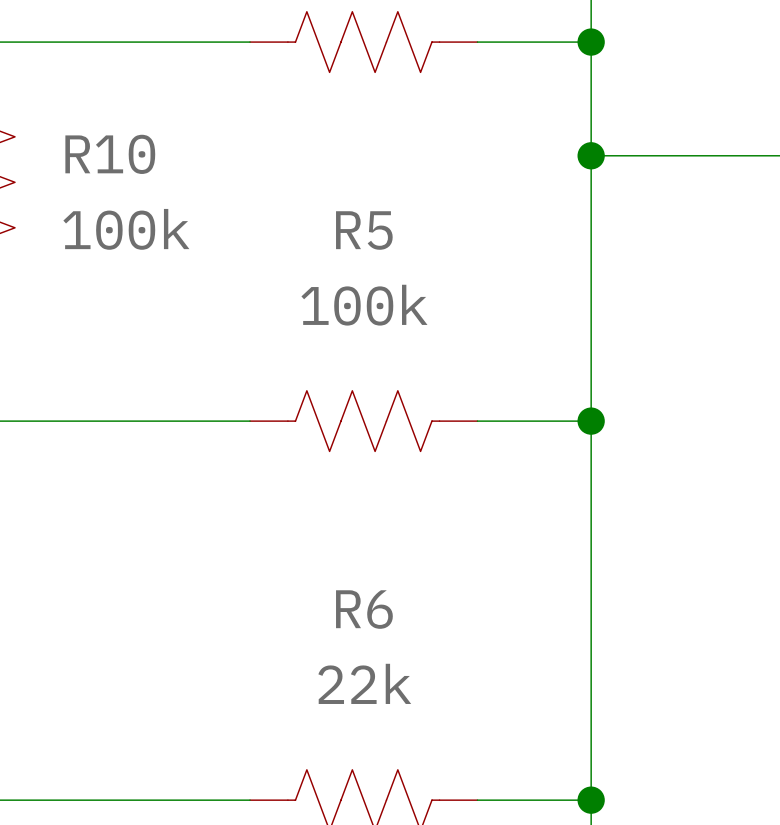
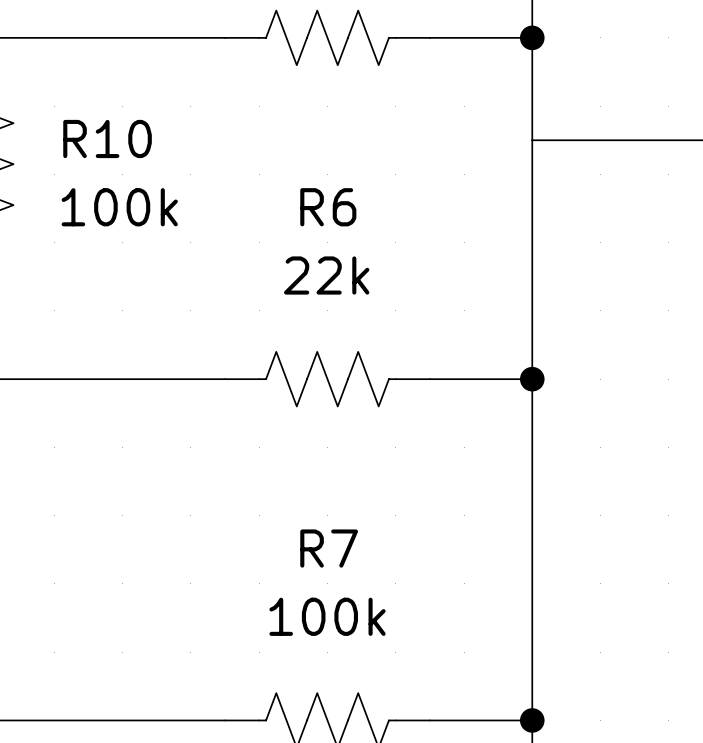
junction: (591, 155) -> none
R5 name: R5 (364, 230) -> R6 (328, 207)
R5 value: 100k (364, 305) -> 22k (326, 275)
R6 name: R6 (364, 609) -> R7 (329, 548)
R6 value: 22k (364, 683) -> 100k (327, 616)

